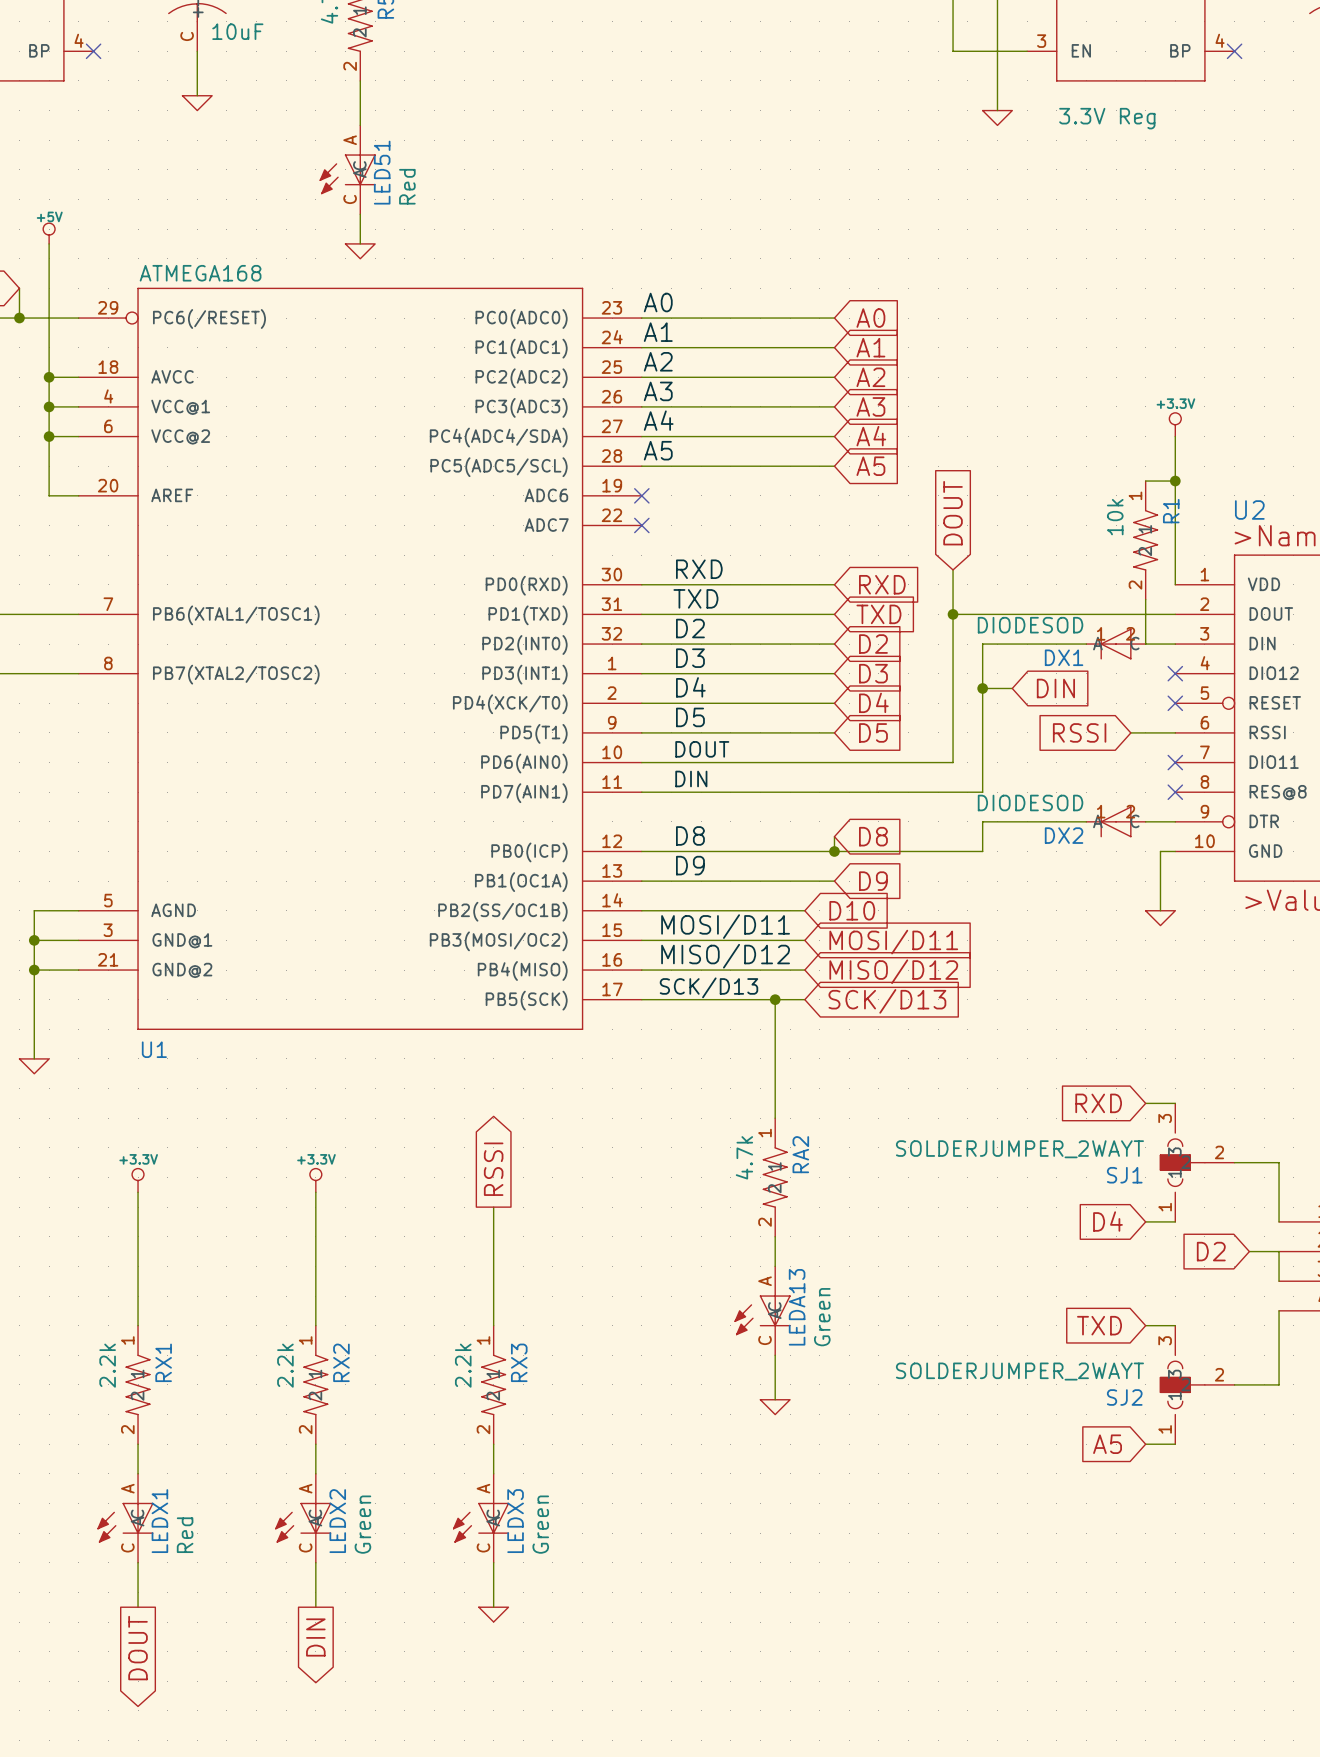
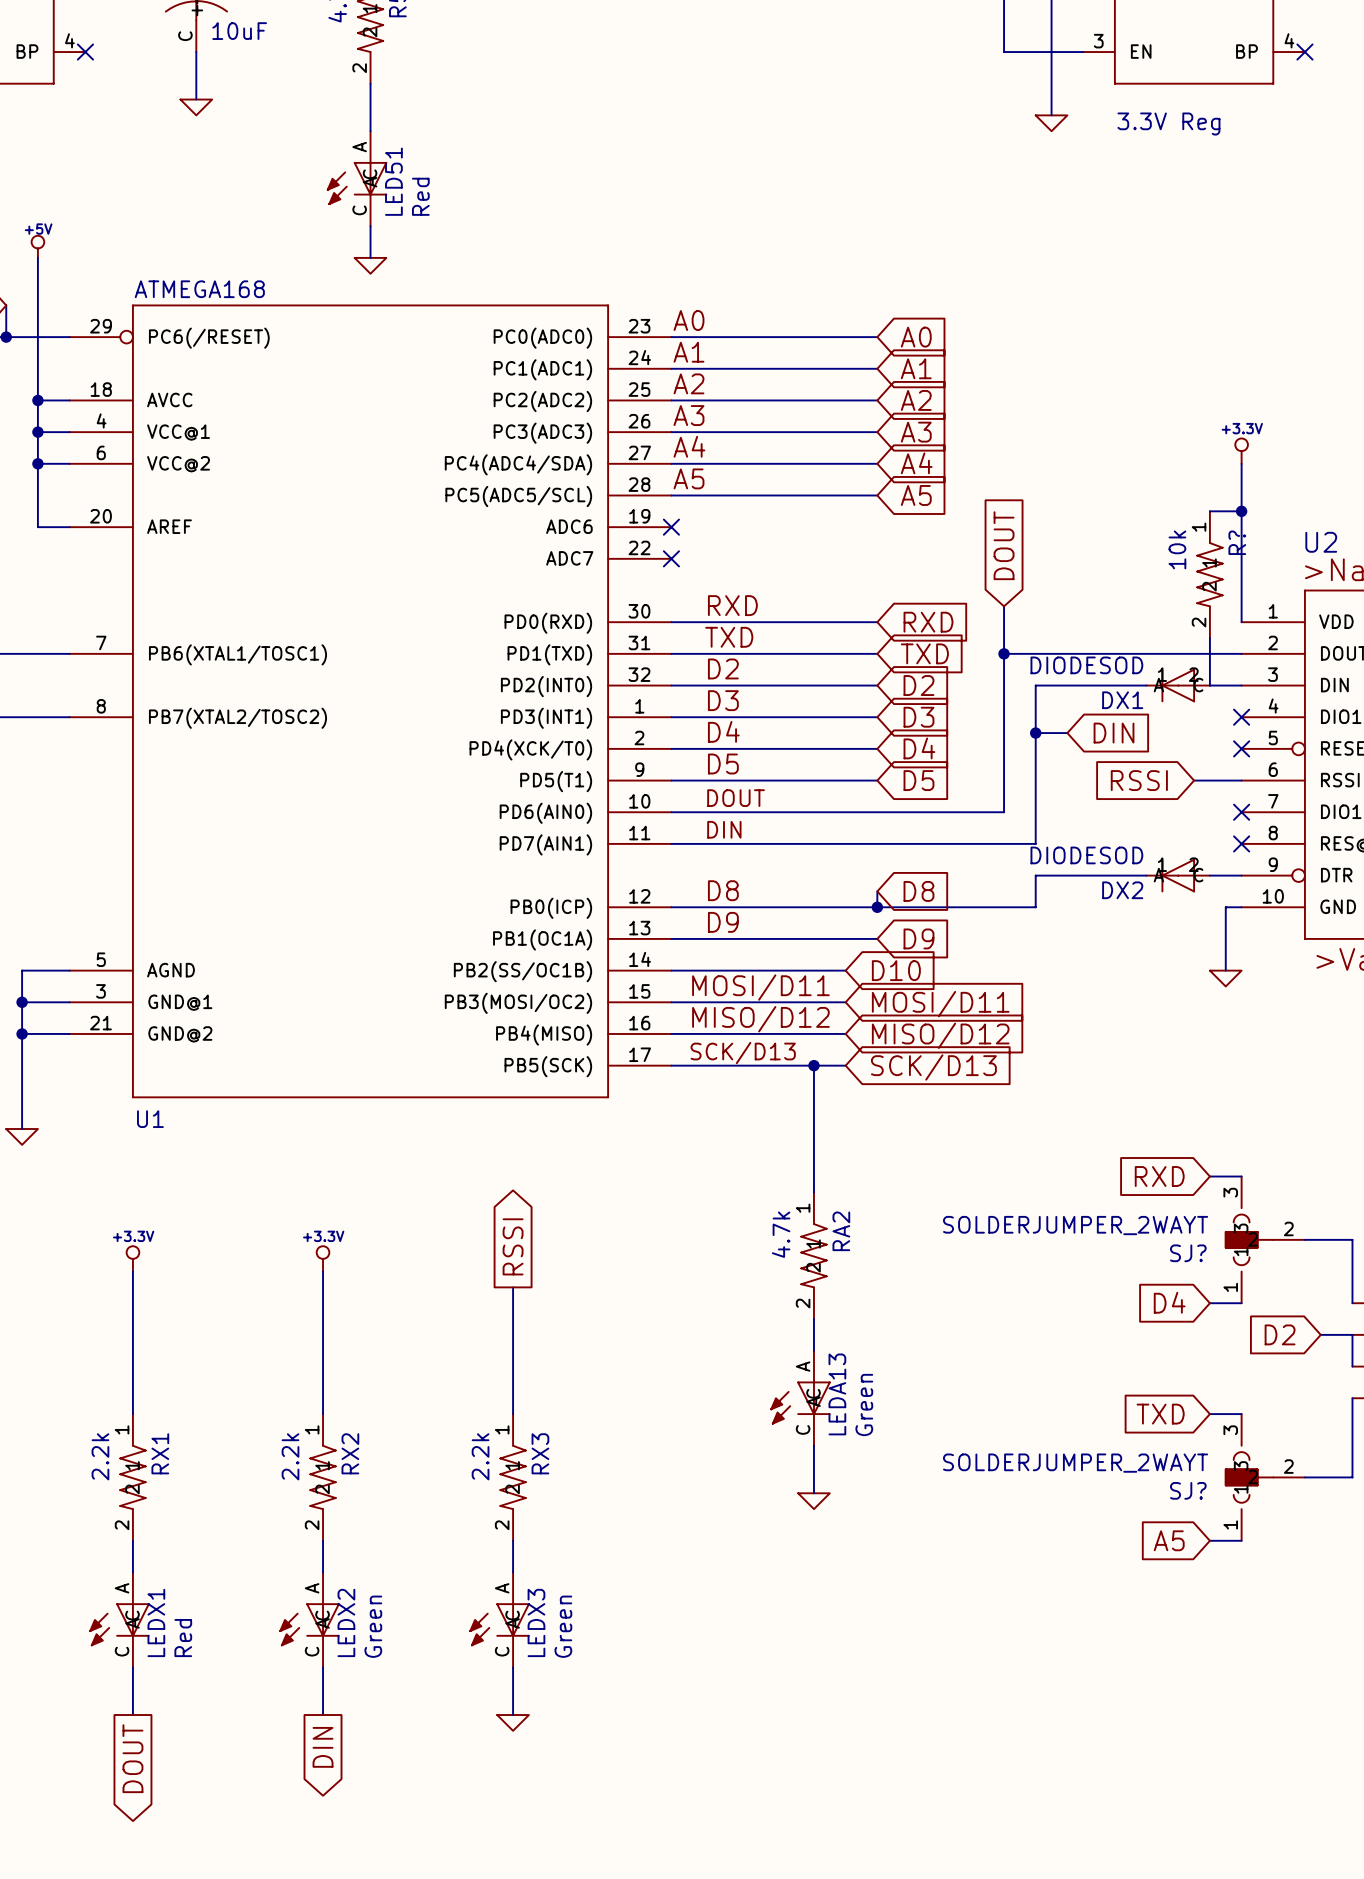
R1 name: R1 (1171, 511) -> R? (1237, 542)
SJ1 name: SJ1 (1124, 1175) -> SJ? (1188, 1253)
SJ2 name: SJ2 (1124, 1397) -> SJ? (1188, 1490)

